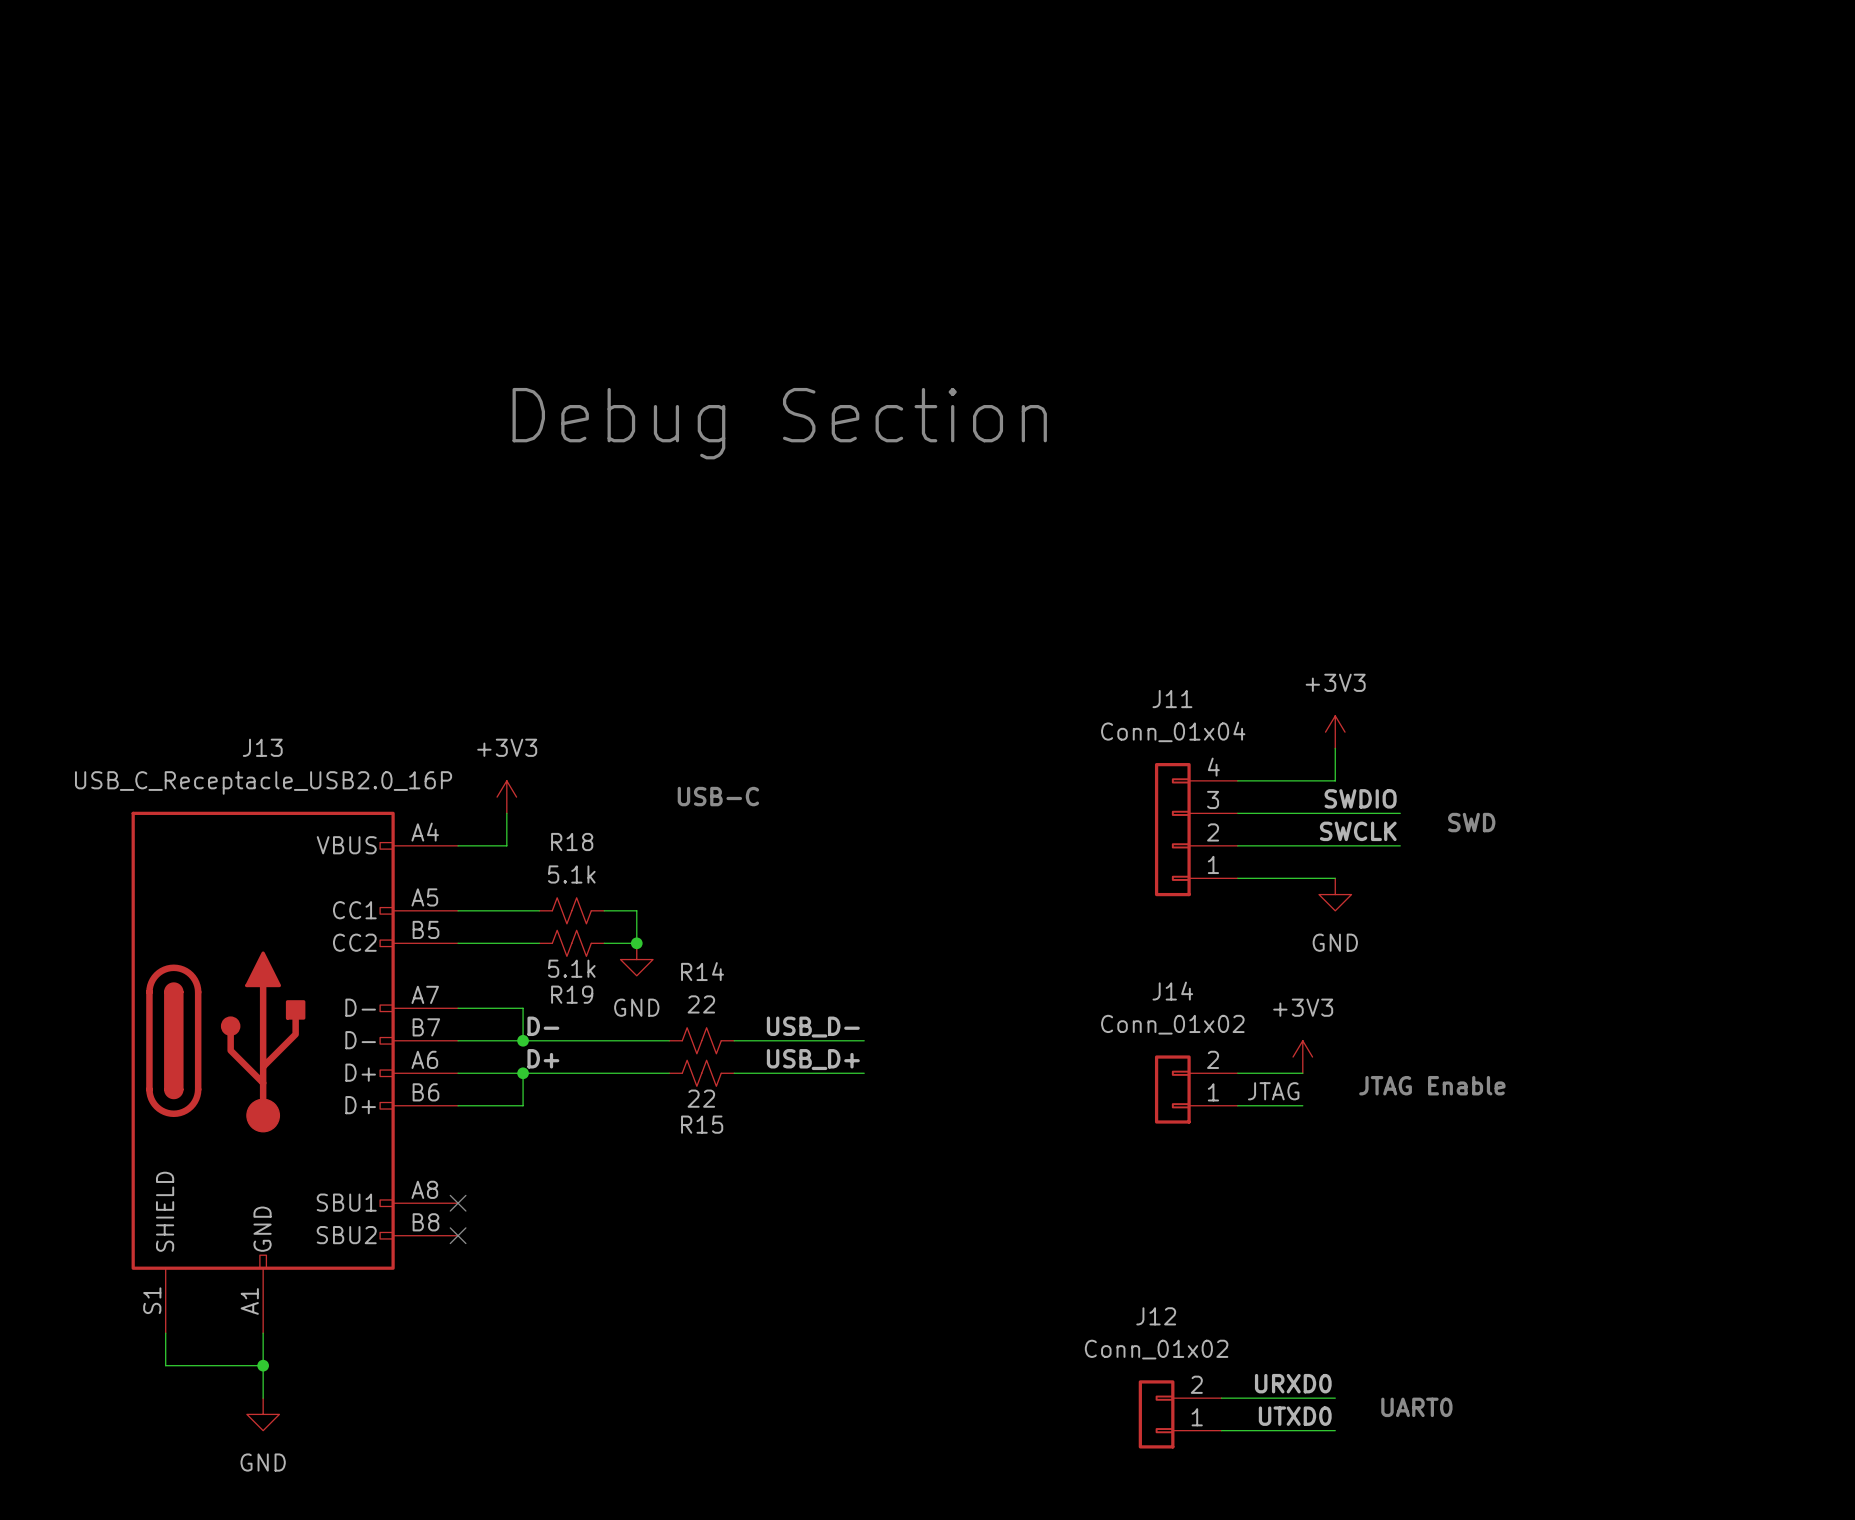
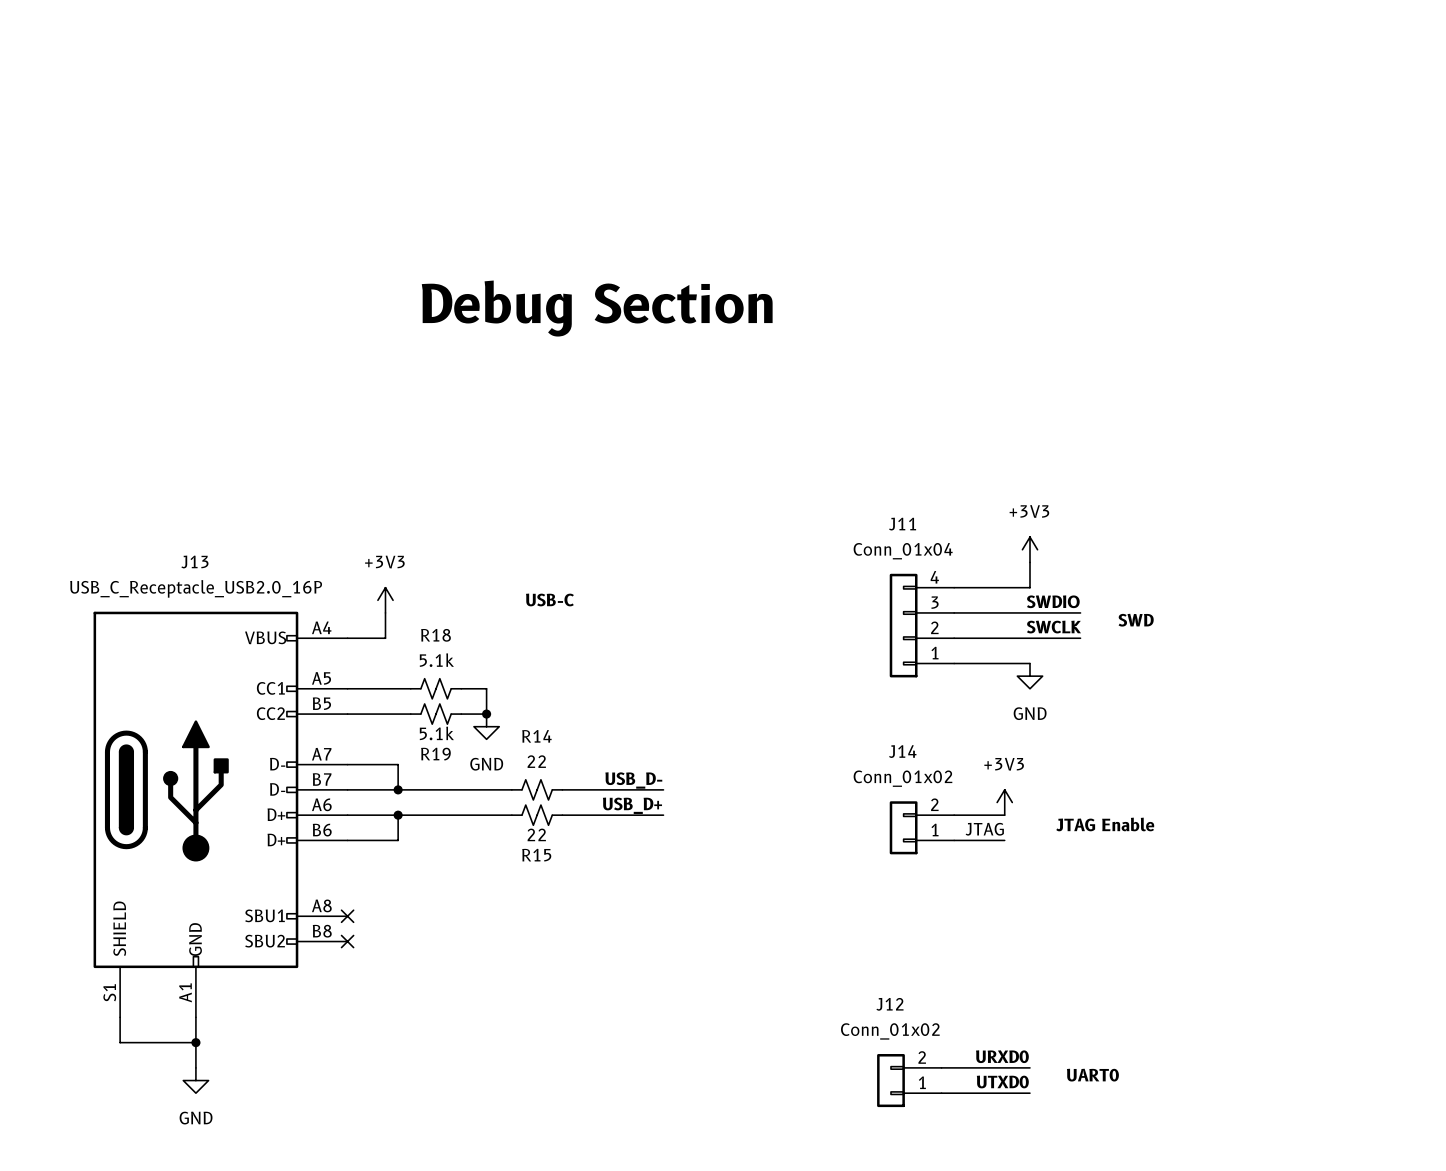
label: D- (543, 1026) -> none
label: D+ (543, 1058) -> none

